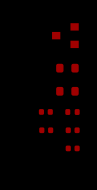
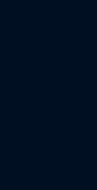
part: (65, 35) -> none
part: (67, 68) -> none
part: (67, 91) -> none
part: (45, 111) -> none
part: (72, 112) -> none
part: (46, 130) -> none
part: (72, 130) -> none
part: (72, 148) -> none

